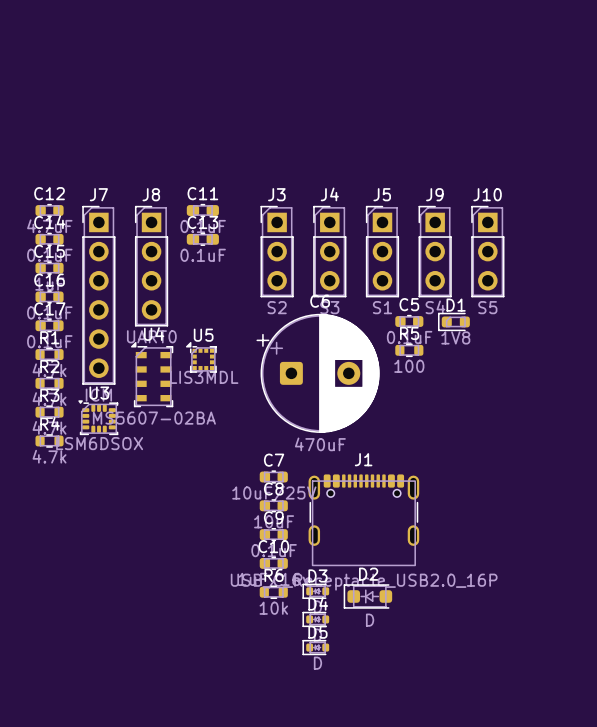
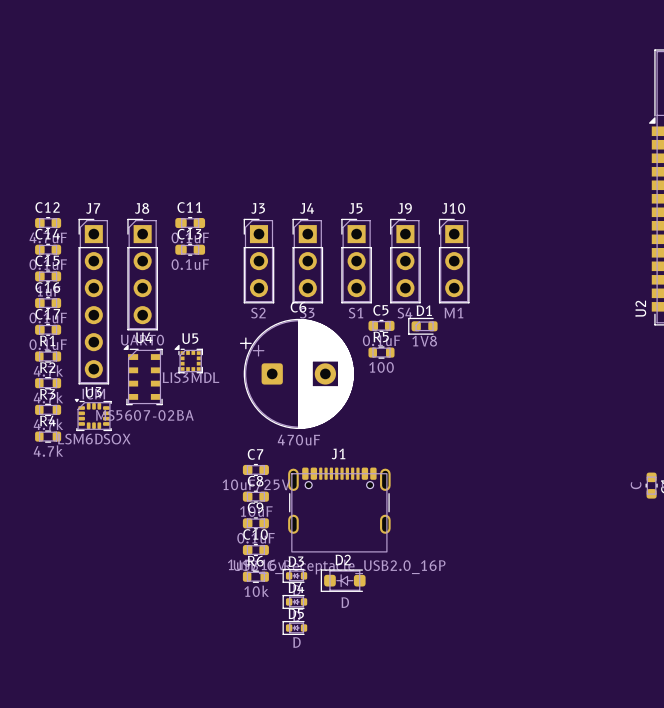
J10 value: S5 (487, 307) -> M1 (453, 313)

